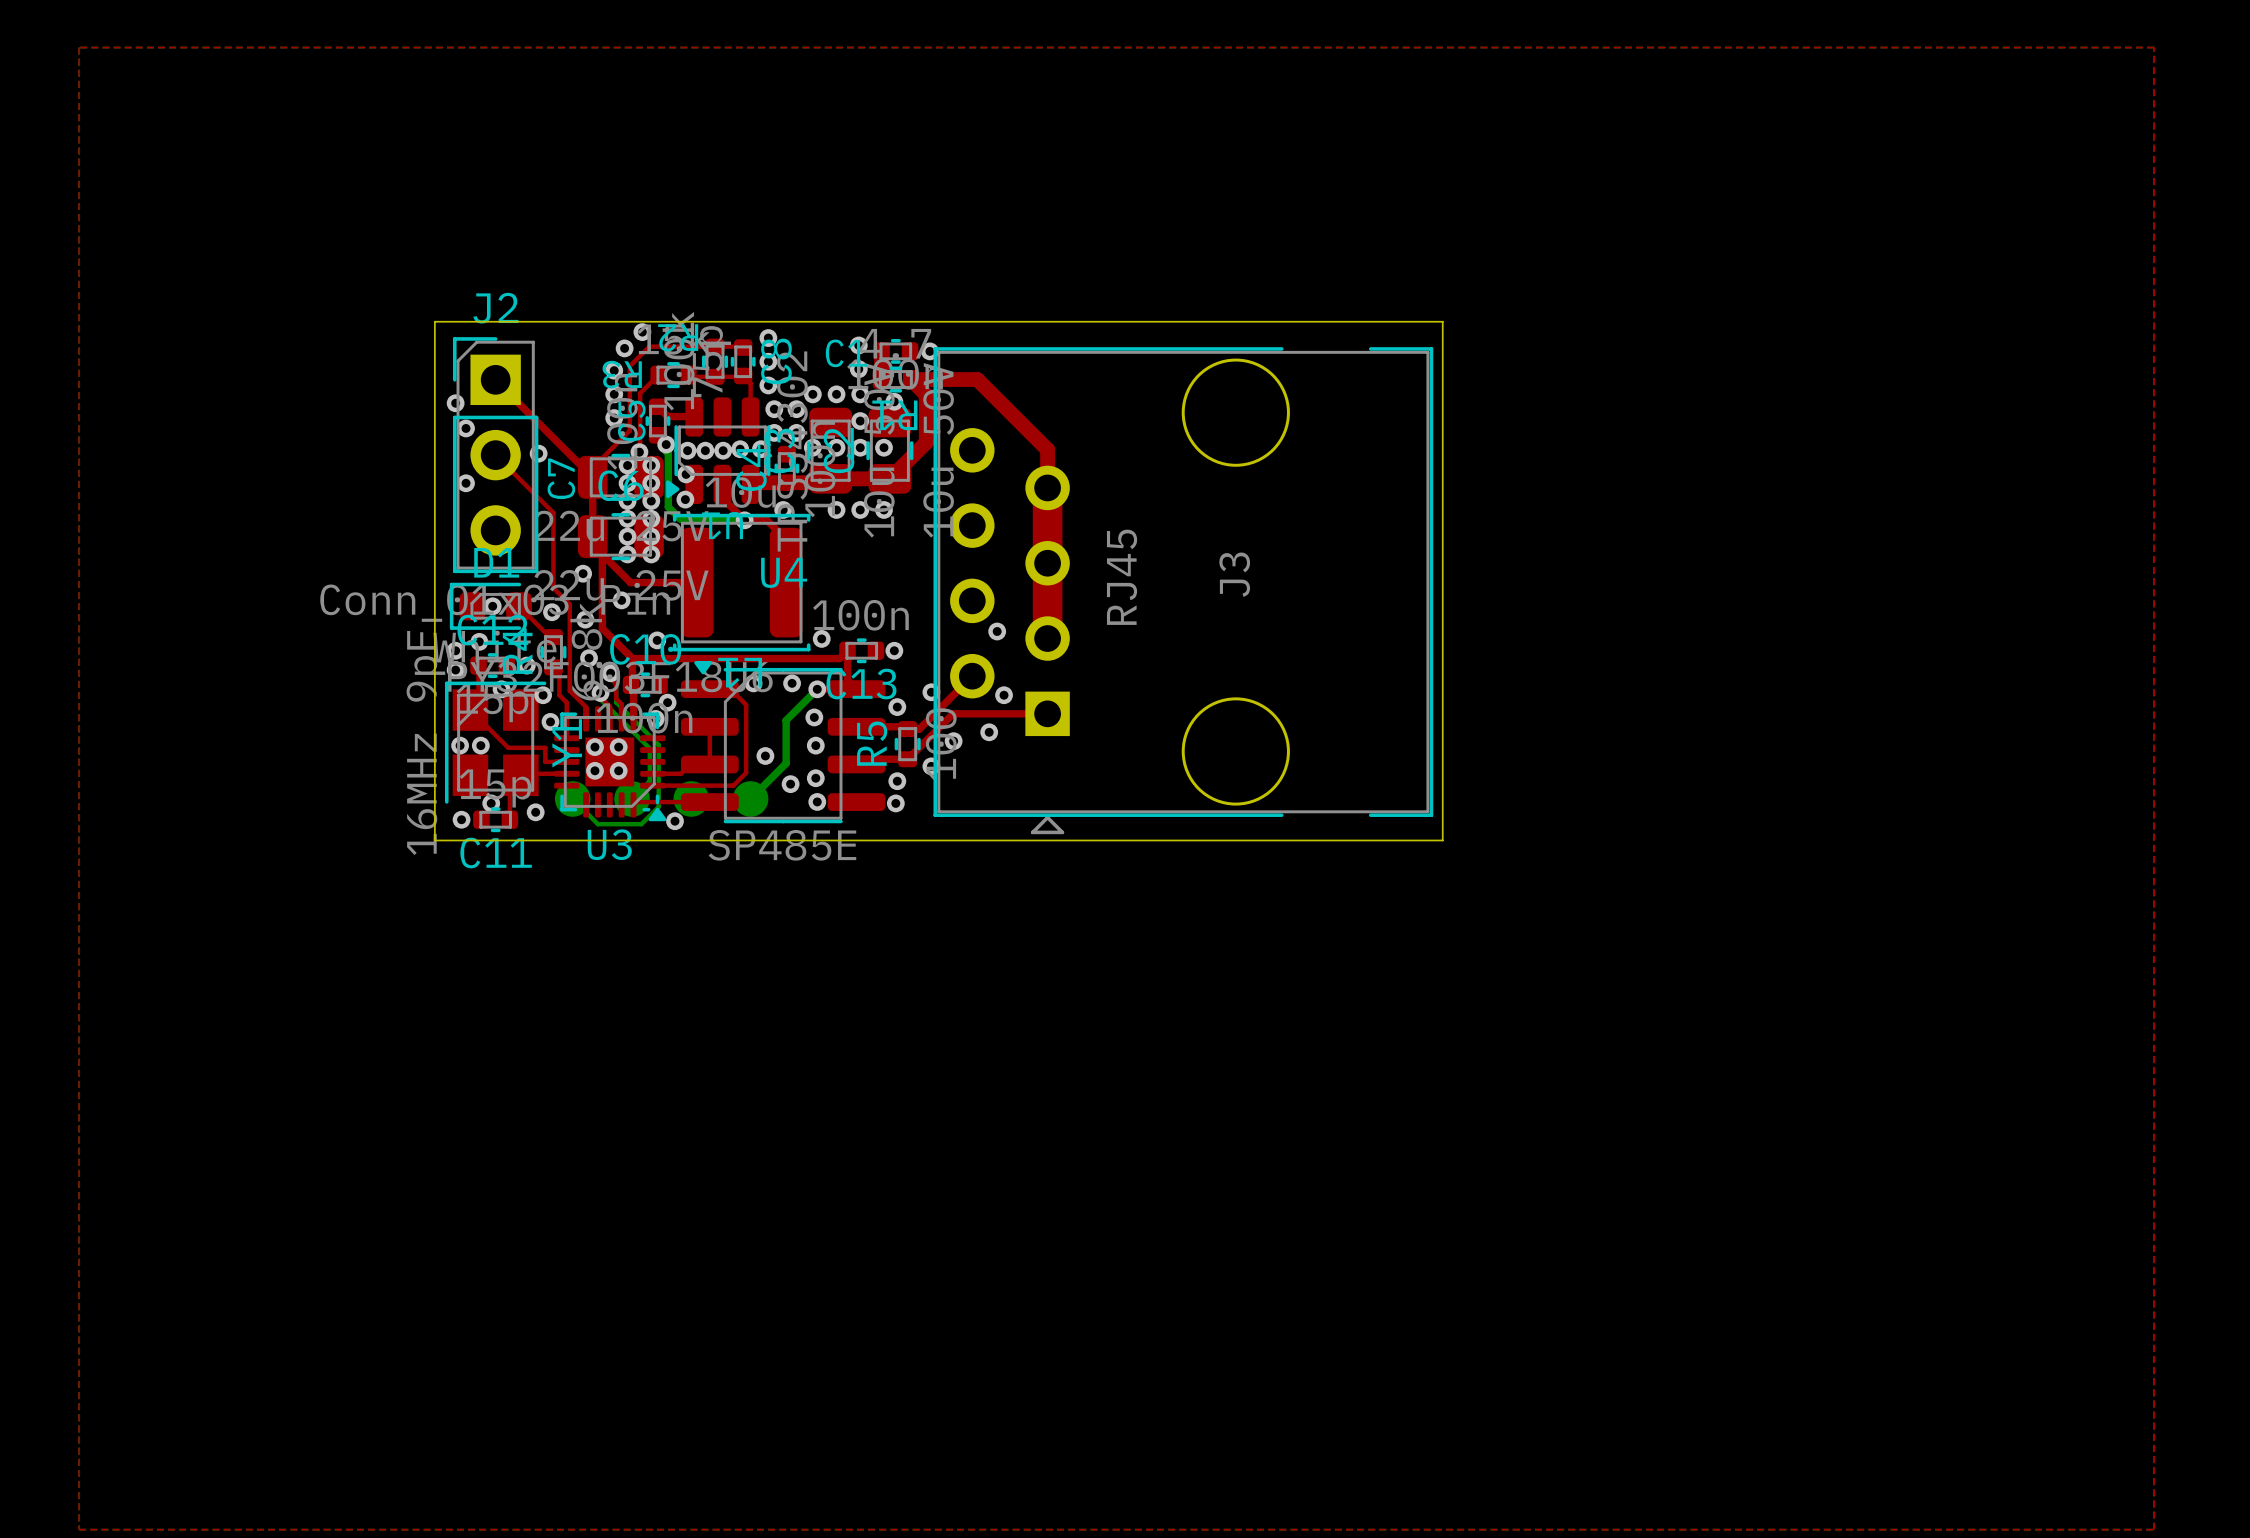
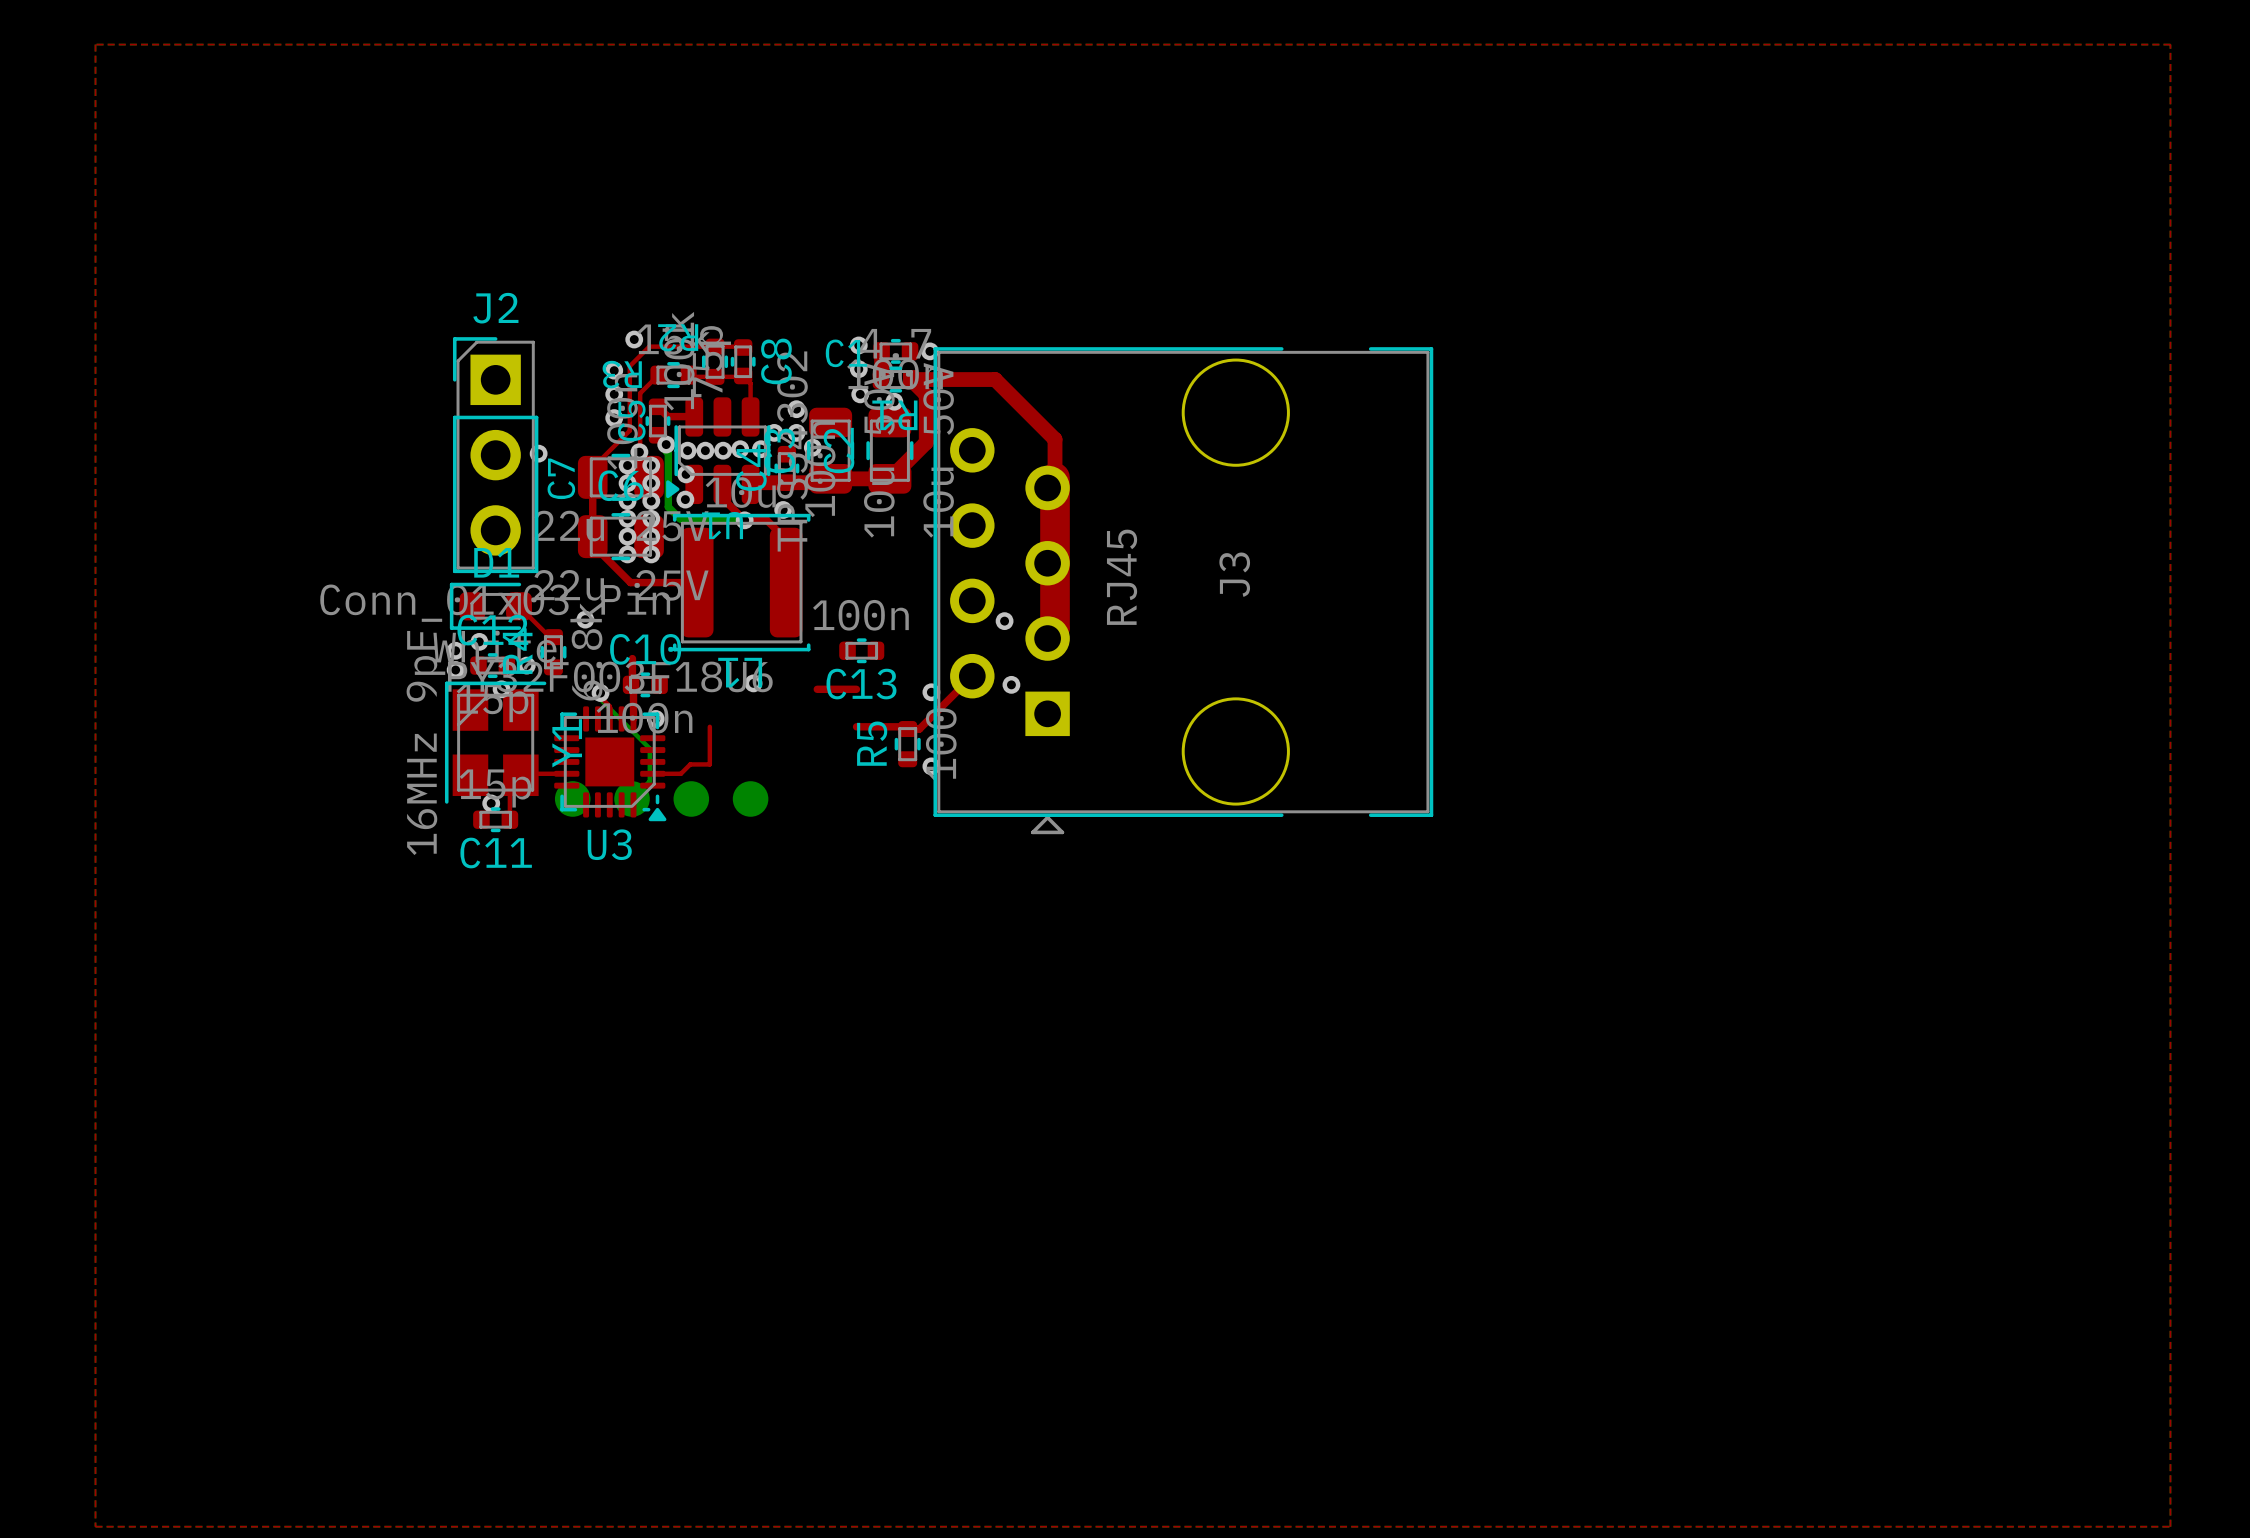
top zone outline: (79, 47) (79, 1529) (2154, 1529) (2154, 47) (79, 47) -> (95, 44) (95, 1526) (2170, 1526) (2170, 44) (95, 44)
board edge: (434, 321) (1442, 321) (1442, 840) (434, 840) (434, 321) -> none
via: (642, 332) -> none
via: (768, 338) -> none
via: none -> (634, 339)
via: (624, 348) -> none
via: (768, 361) -> none
top track: (977, 379) (1047, 449) (1047, 638) (1055, 638) -> (977, 379) (995, 379) (1055, 439) (1055, 628) (1062, 628)
via: (768, 385) -> none
via: (812, 394) -> none
via: (836, 394) -> none
top track: (516, 401) (592, 477) -> none
via: (455, 403) -> none
via: (774, 409) -> none
via: (860, 421) -> none
via: (466, 428) -> none
via: (836, 447) -> none
via: (860, 447) -> none
via: (883, 447) -> none
top track: (495, 455) (553, 512) (553, 588) (569, 604) (569, 690) (586, 707) (586, 718) -> none
via: (466, 483) -> none
via: (836, 509) -> none
via: (860, 509) -> none
via: (883, 509) -> none
top track: (592, 536) (602, 546) (602, 628) (632, 658) (839, 658) (847, 650) (847, 680) (856, 689) -> none
via: (583, 573) -> none
via: (621, 600) -> none
via: (492, 606) -> none
via: (551, 612) -> none
via position: (997, 631) -> (1004, 621)
via: (821, 638) -> none
via: (657, 640) -> none
via: (894, 650) -> none
via: (589, 658) -> none
top track: (478, 665) (478, 702) (470, 710) (508, 747) (545, 747) (545, 761) (566, 761) -> none
top track: (553, 667) (559, 673) (559, 695) (566, 702) (566, 738) -> none
top track: (610, 673) (610, 678) (616, 683) (616, 698) (621, 704) (621, 718) -> none
bottom track: (610, 673) (610, 678) (616, 683) (616, 702) (658, 744) (658, 806) (641, 824) (597, 824) (572, 798) -> none
via: (610, 673) -> none
via: (792, 683) -> none
top track: (709, 689) (730, 689) (746, 704) (746, 772) (733, 785) (652, 785) -> none
bottom track: (817, 689) (786, 720) (786, 763) (750, 798) -> none
via: (817, 689) -> none
via: (543, 695) -> none
via position: (1004, 695) -> (1011, 684)
via: (667, 702) -> none
via: (897, 707) -> none
top track: (1047, 713) (953, 713) (907, 759) (861, 759) (856, 764) -> none
via: (814, 717) -> none
via: (550, 721) -> none
via: (989, 732) -> none
via: (953, 741) -> none
U4: SP485E (783, 742) -> none
via: (460, 745) -> none
via: (480, 745) -> none
via: (815, 745) -> none
via: (594, 747) -> none
via: (618, 747) -> none
via: (765, 755) -> none
via: (594, 770) -> none
via: (618, 770) -> none
via: (815, 778) -> none
via: (897, 781) -> none
via: (790, 784) -> none
via: (817, 801) -> none
top track: (709, 802) (636, 802) (633, 804) -> none
via: (895, 803) -> none
via: (535, 812) -> none
via: (461, 819) -> none
via: (675, 821) -> none

